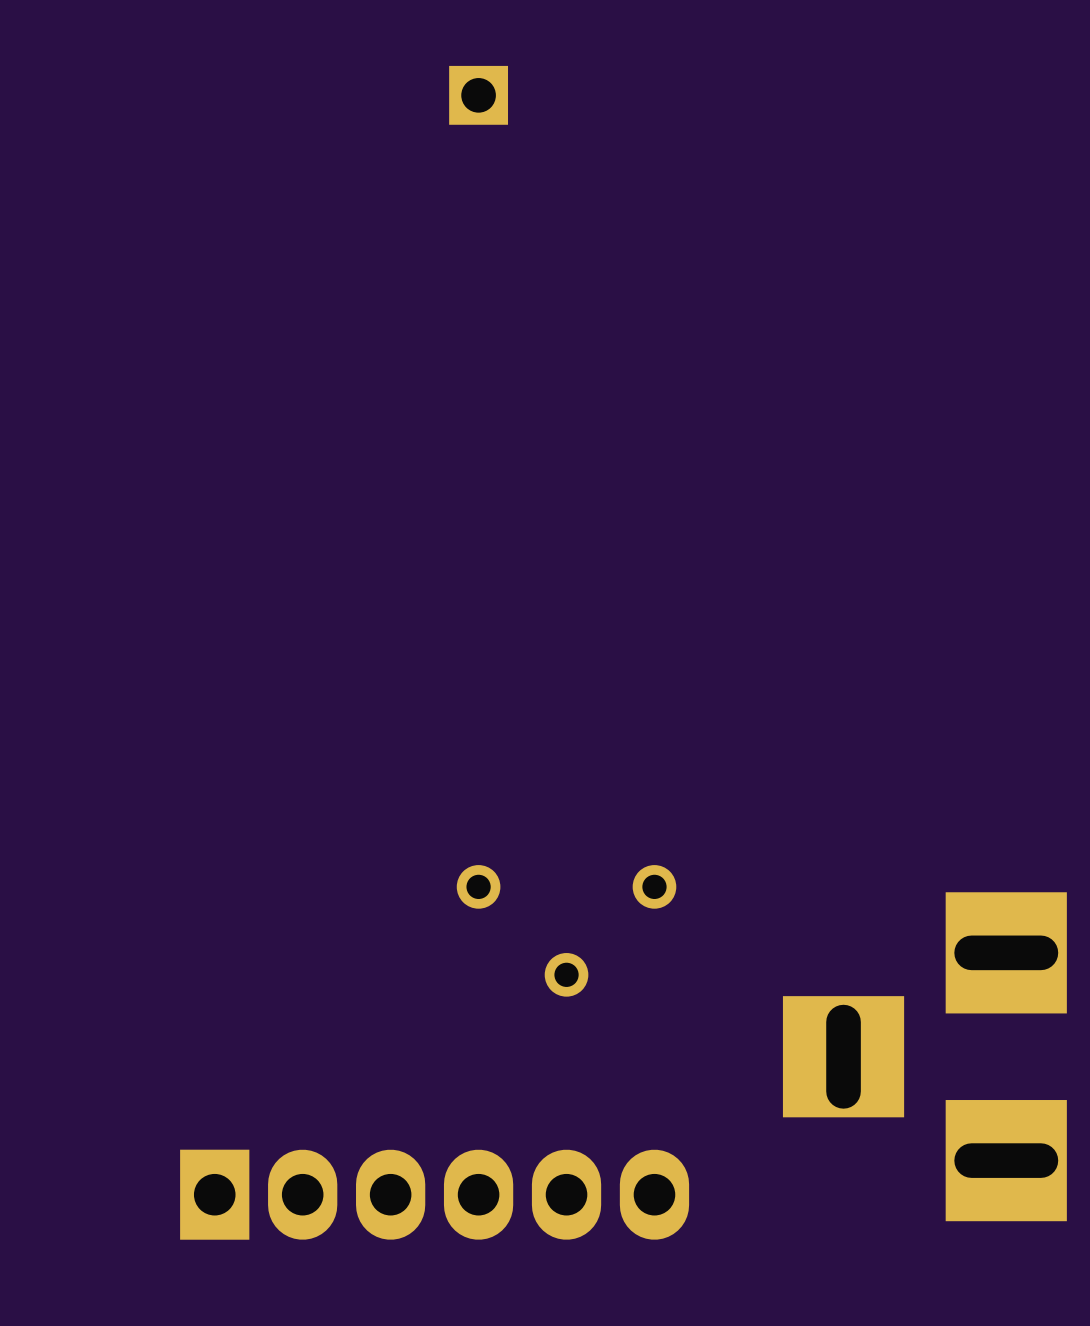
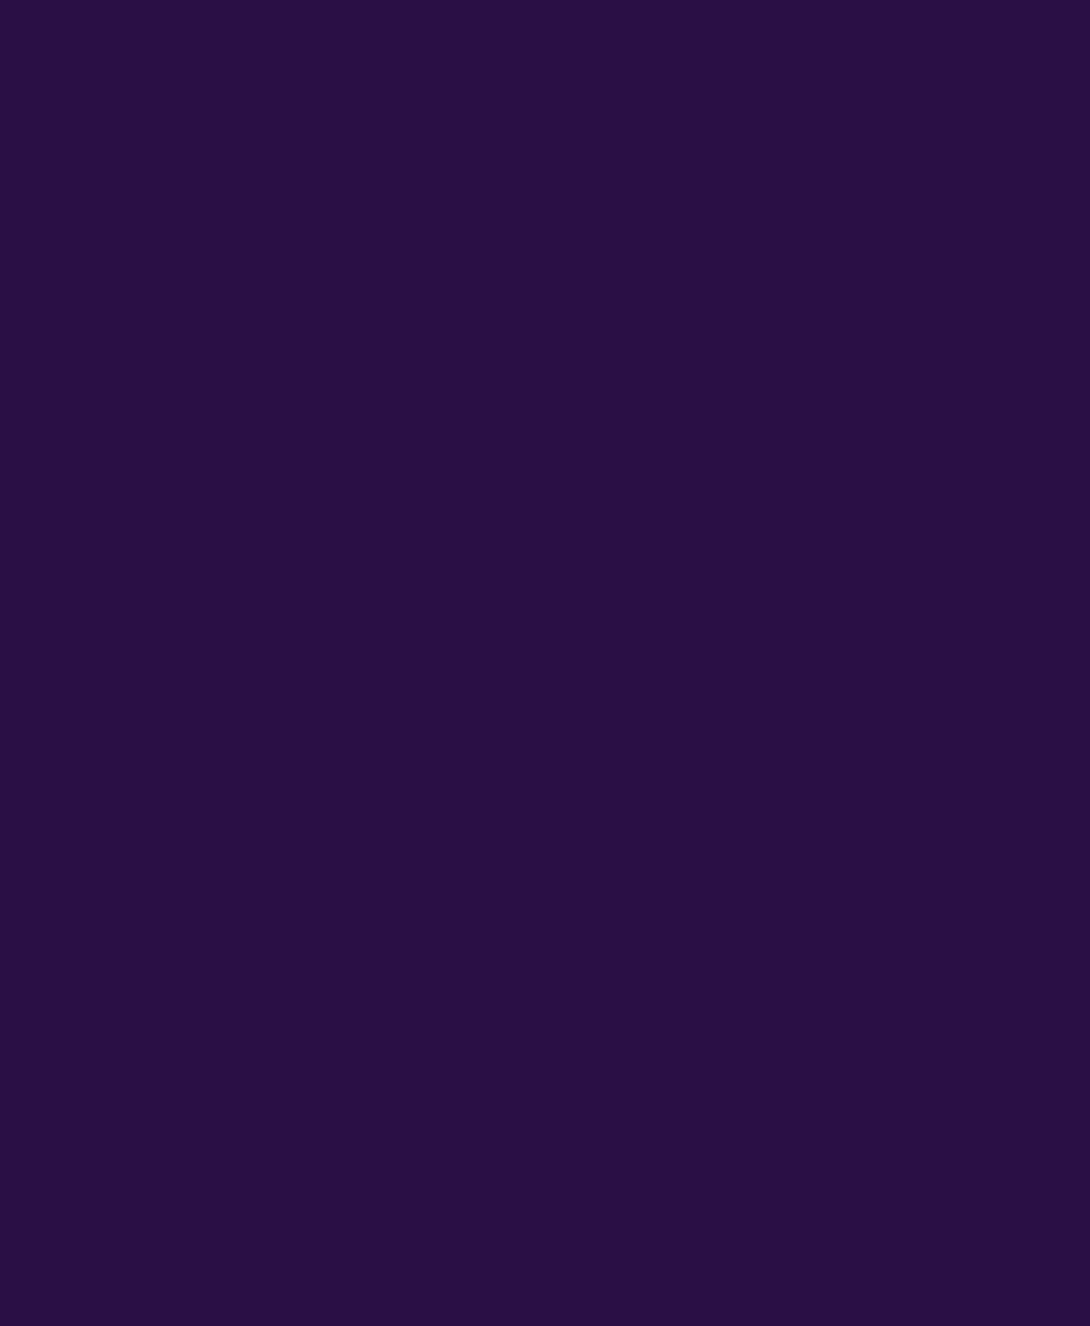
part: (478, 95) -> none
part: (566, 930) -> none
part: (924, 1056) -> none
part: (434, 1194) -> none

